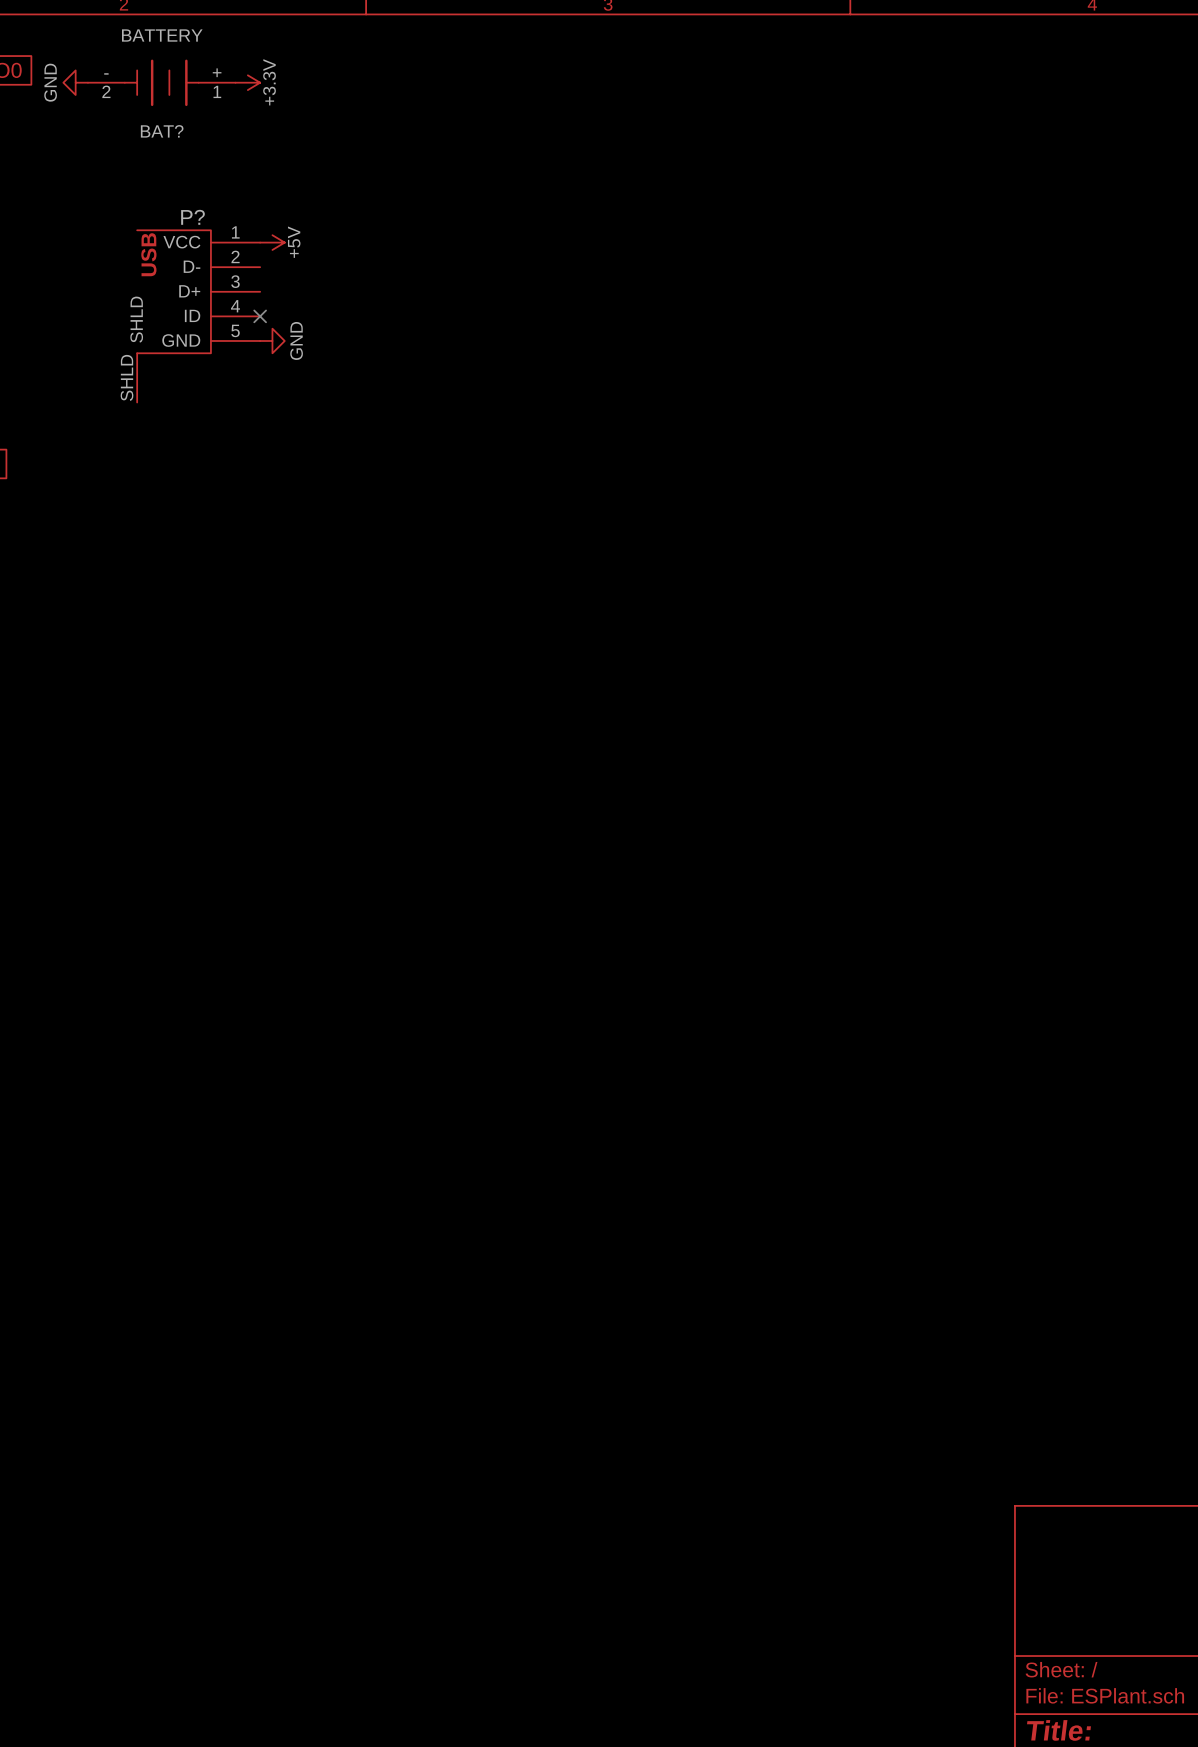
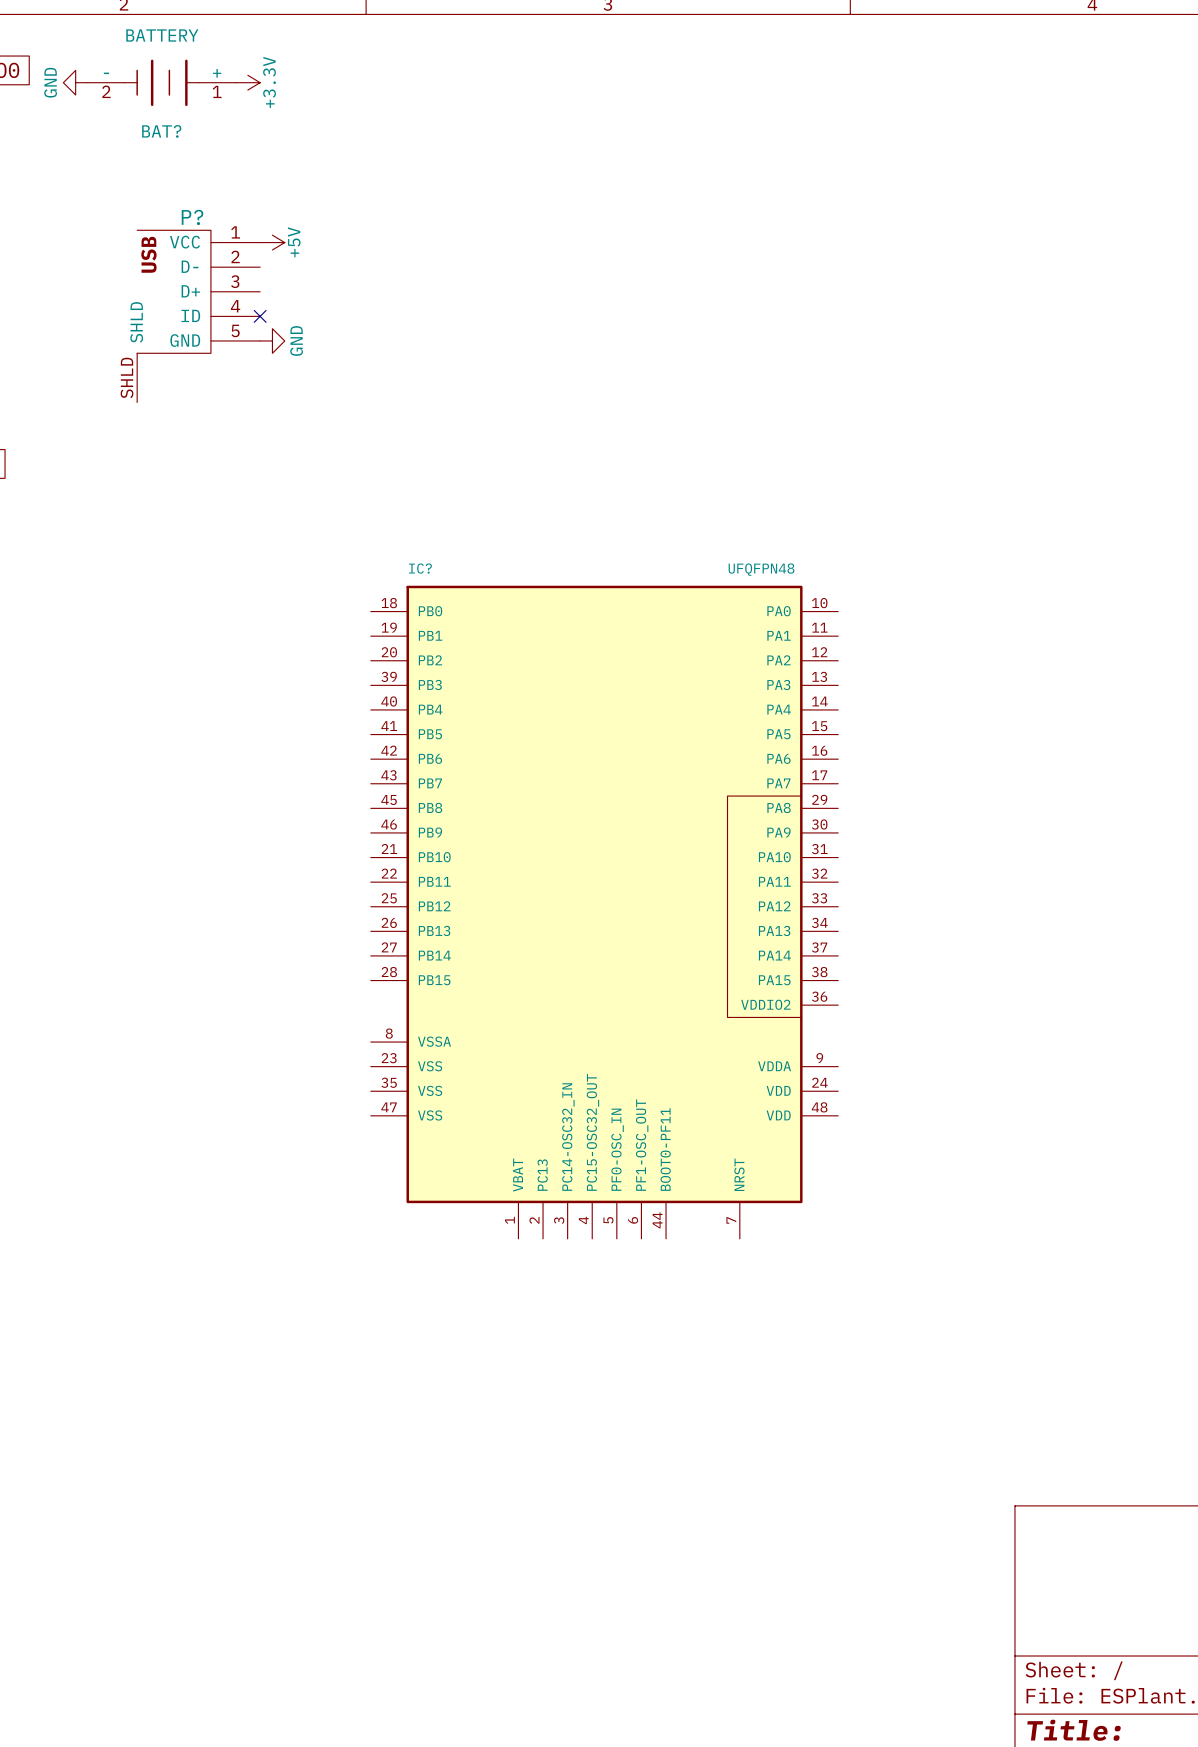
IC?: none -> UFQFPN48 (604, 912)

